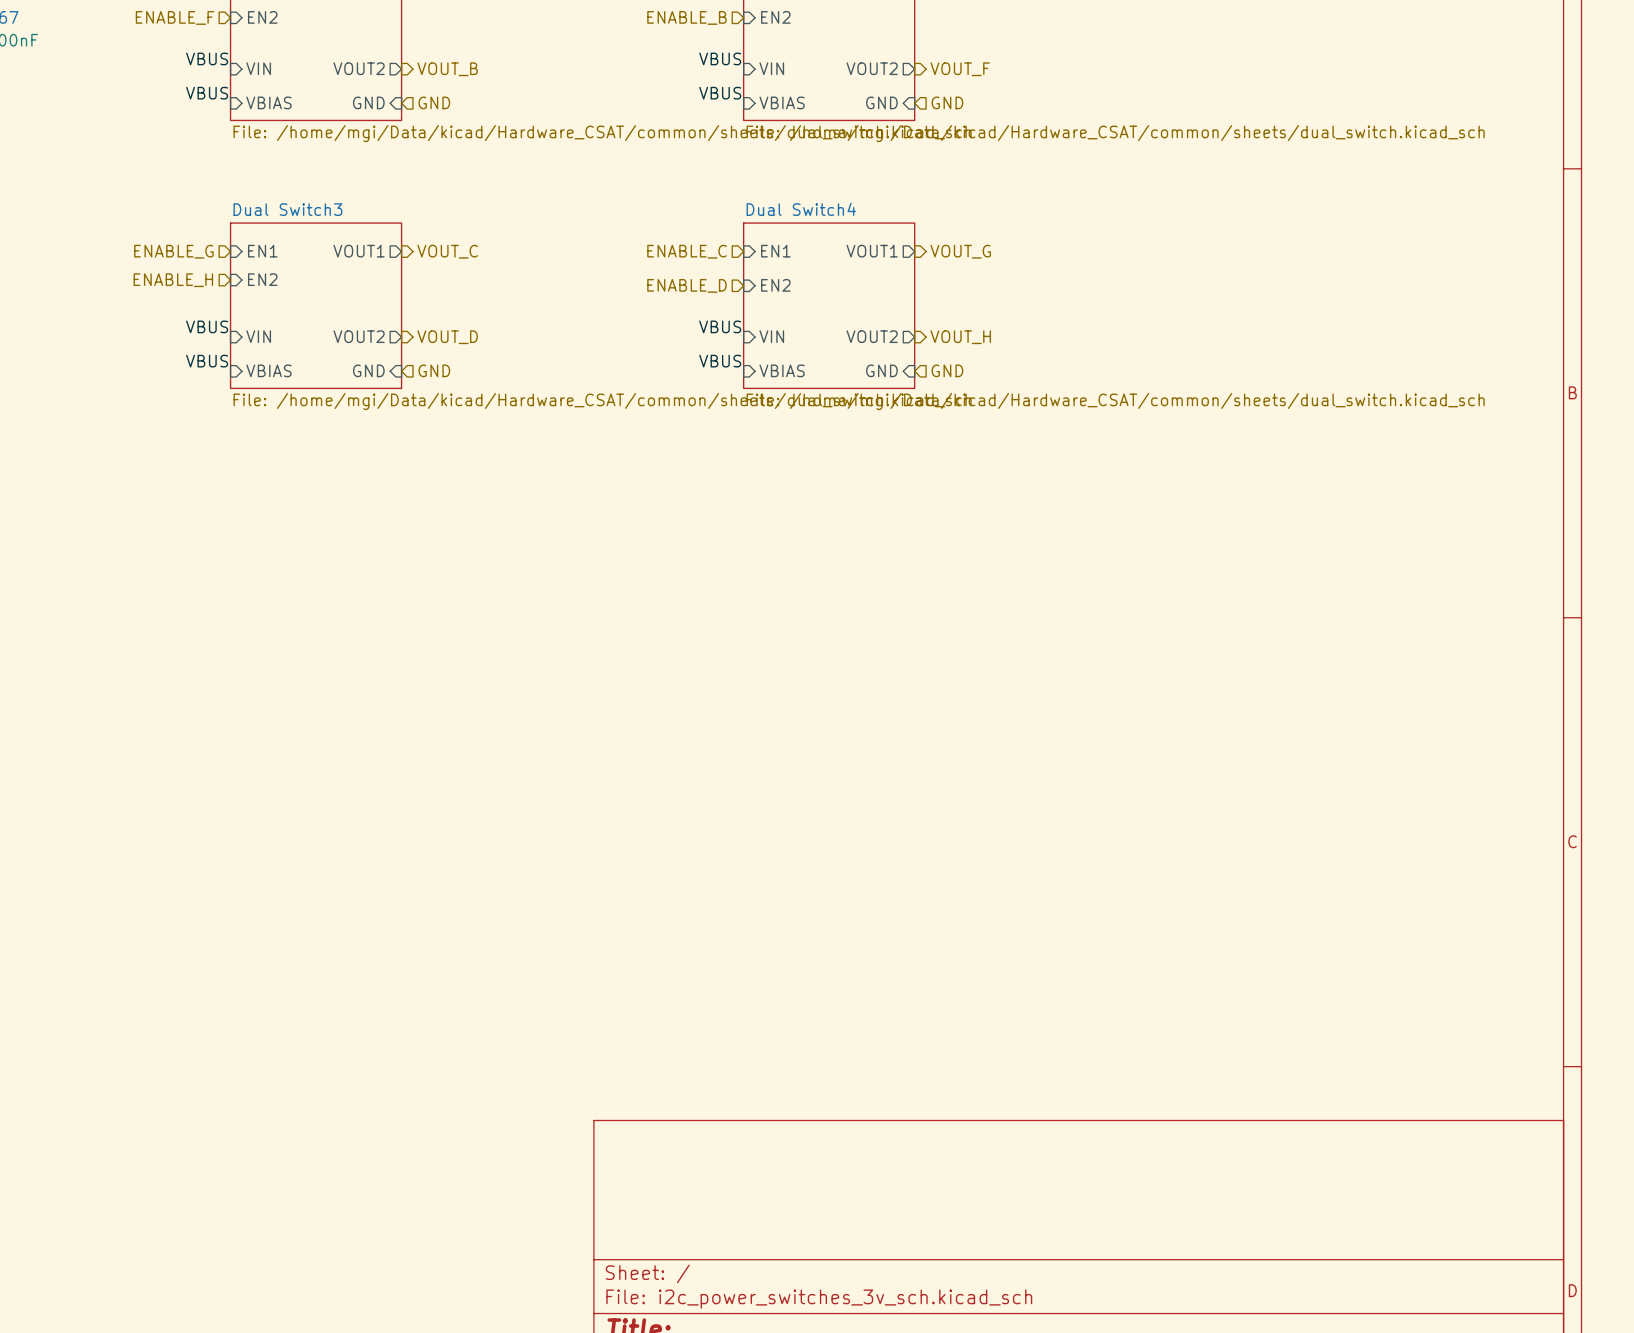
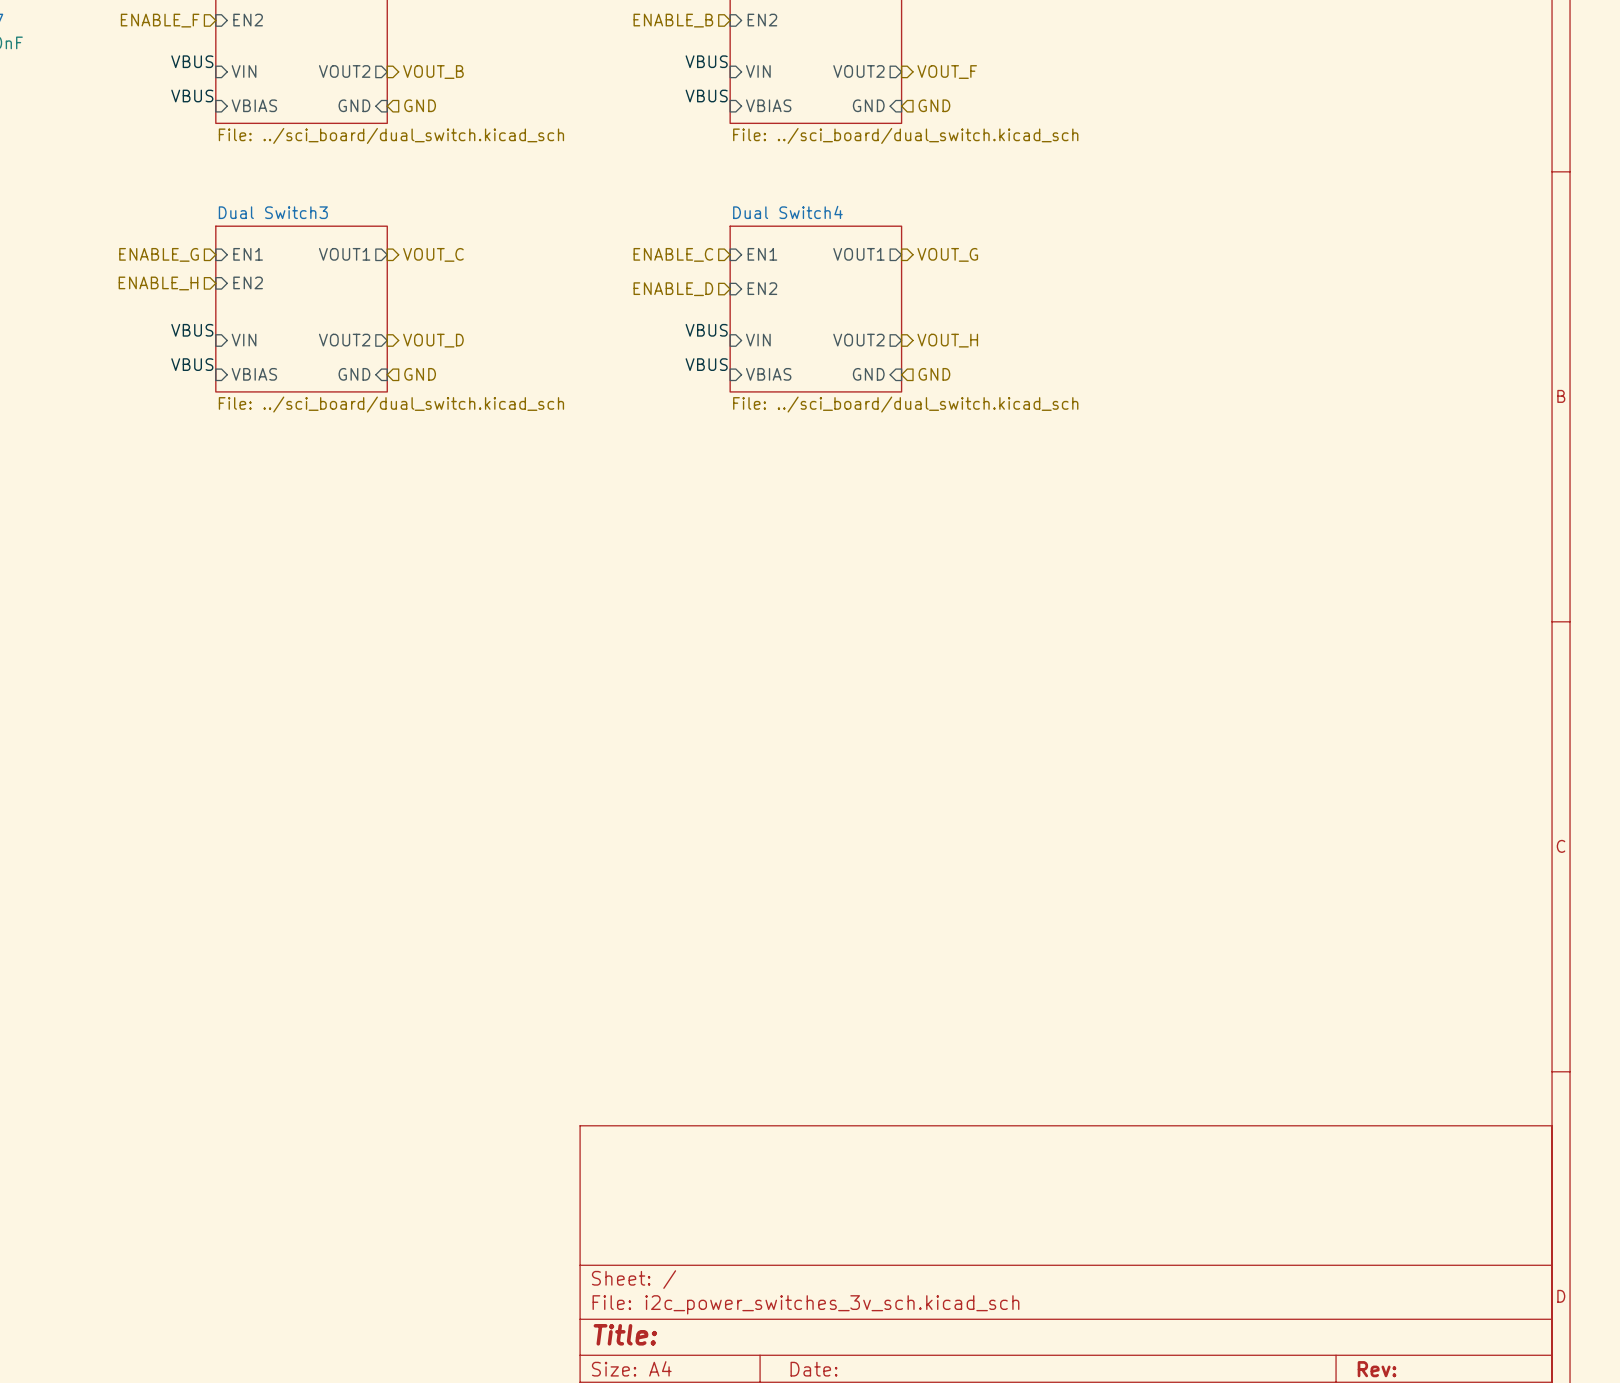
sheet value: File: /home/mgi/Data/kicad/Hardware_CSAT/common/sheets/dual_switch.kicad_sch (602, 133) -> File: ../sci_board/dual_switch.kicad_sch (391, 135)
sheet value: File: /home/mgi/Data/kicad/Hardware_CSAT/common/sheets/dual_switch.kicad_sch (1115, 133) -> File: ../sci_board/dual_switch.kicad_sch (905, 135)
sheet Dual Switch3 value: File: /home/mgi/Data/kicad/Hardware_CSAT/common/sheets/dual_switch.kicad_sch (602, 401) -> File: ../sci_board/dual_switch.kicad_sch (391, 404)
sheet Dual Switch4 value: File: /home/mgi/Data/kicad/Hardware_CSAT/common/sheets/dual_switch.kicad_sch (1115, 401) -> File: ../sci_board/dual_switch.kicad_sch (905, 404)

